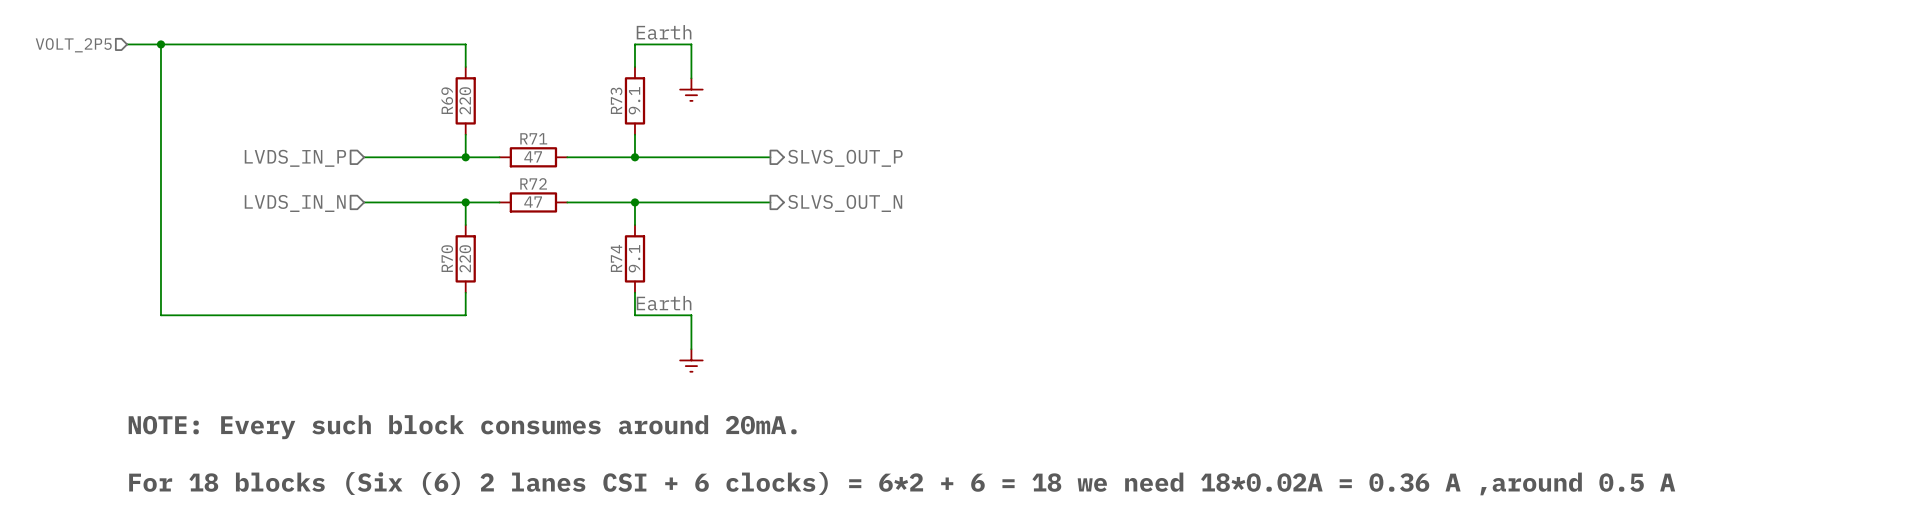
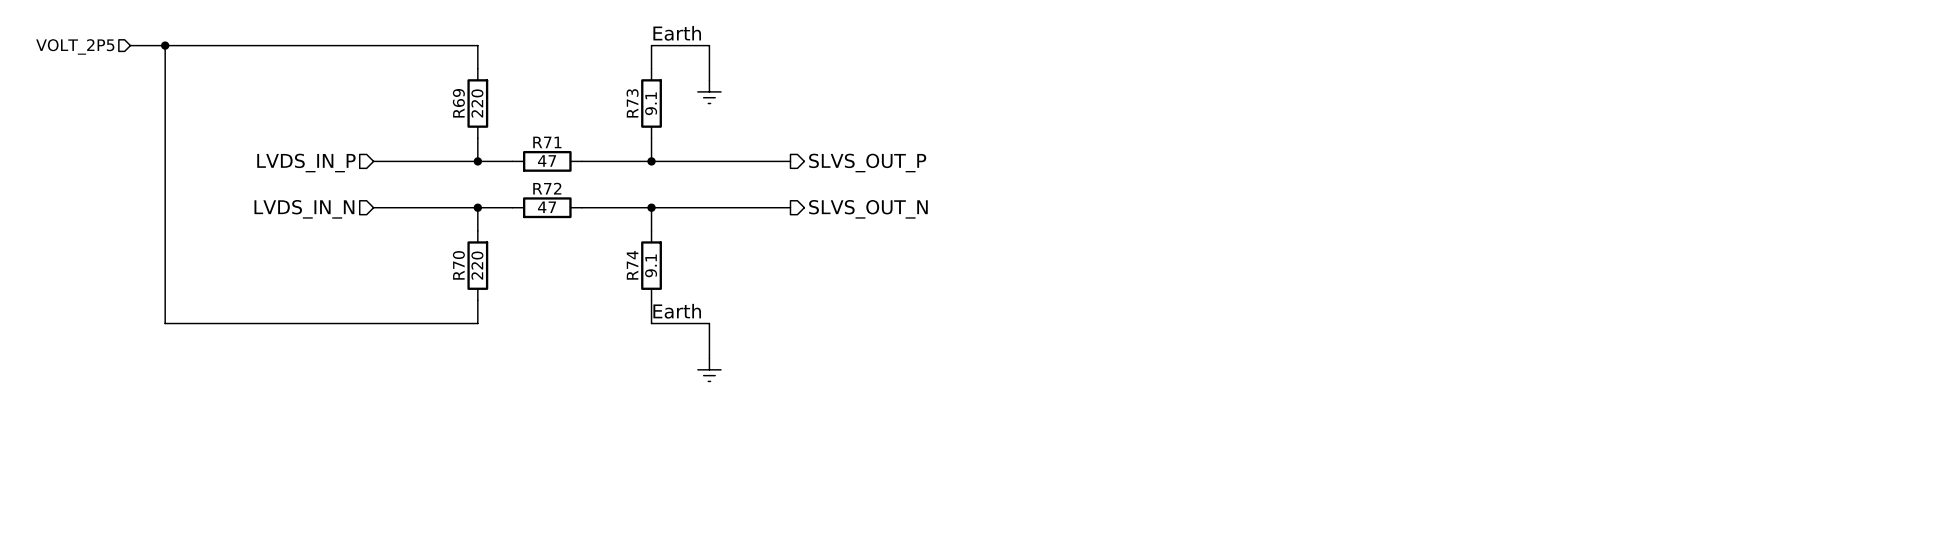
text: NOTE: Every such block consumes around 20mA. (462, 427) -> none
text: For 18 blocks (Six (6) 2 lanes CSI + 6 clocks) = 6*2 + 6 = 18 we need 18*0.02A = 0.36 A ,around 0.5 A (902, 483) -> none

